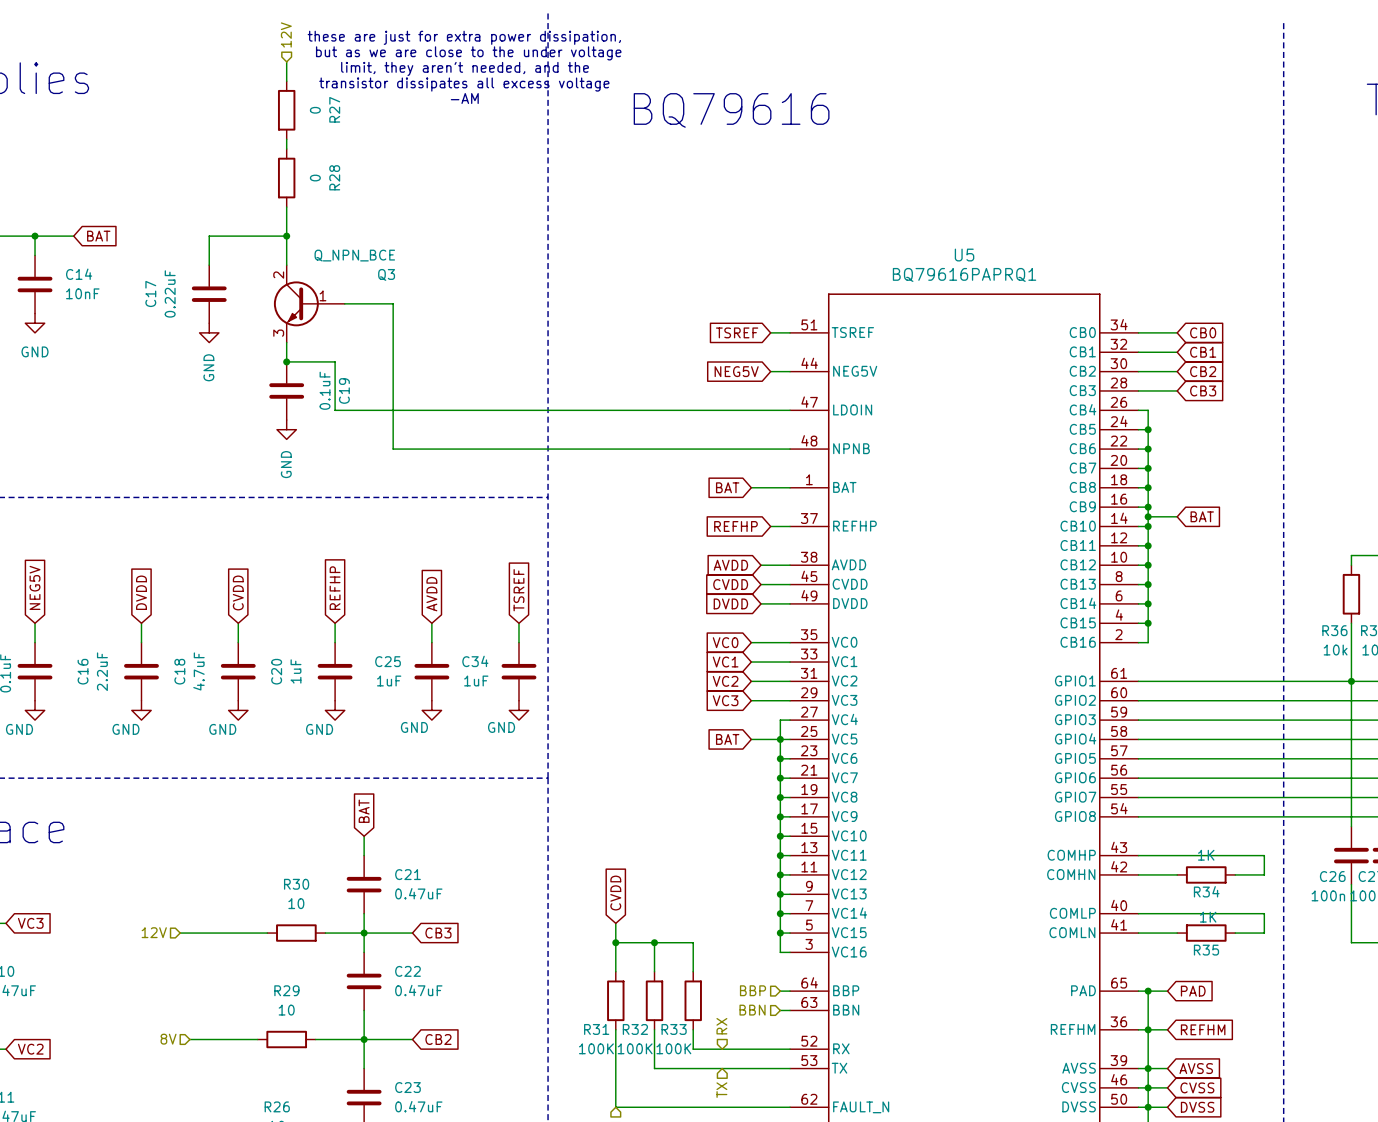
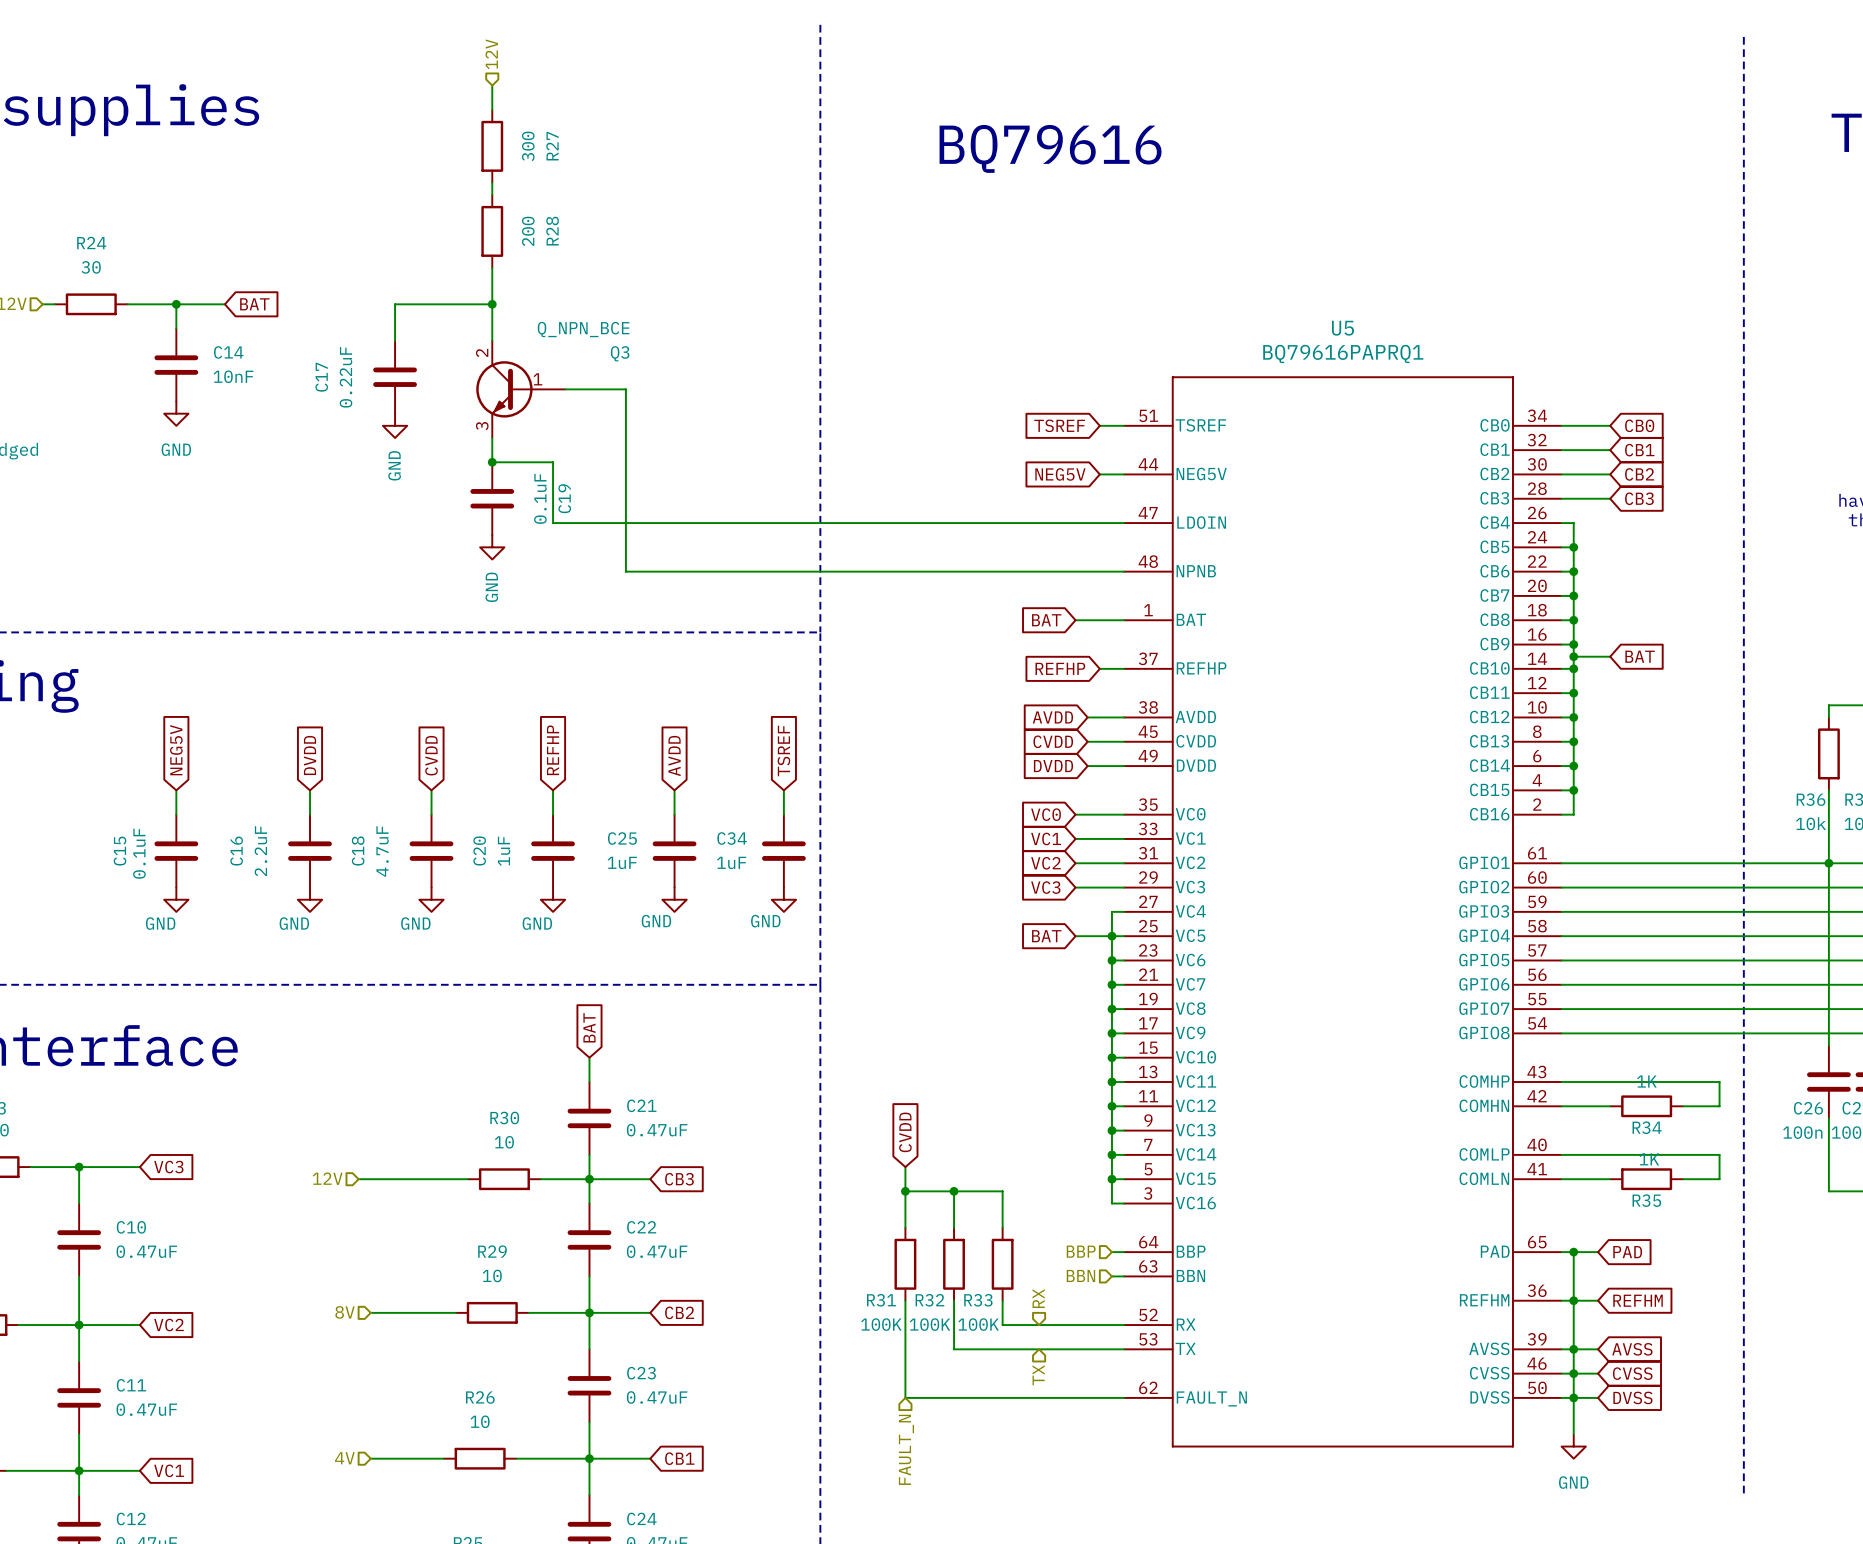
text: these are just for extra power dissipation, (464, 37) -> none
text: but as we are close to the under voltage (468, 53) -> none
text: limit, they aren't needed, and the (465, 68) -> none
text: transistor dissipates all excess voltage (464, 84) -> none
text: -AM (464, 98) -> none
R27 value: 0 (315, 110) -> 300 (528, 146)
R28 value: 0 (315, 178) -> 200 (528, 231)

